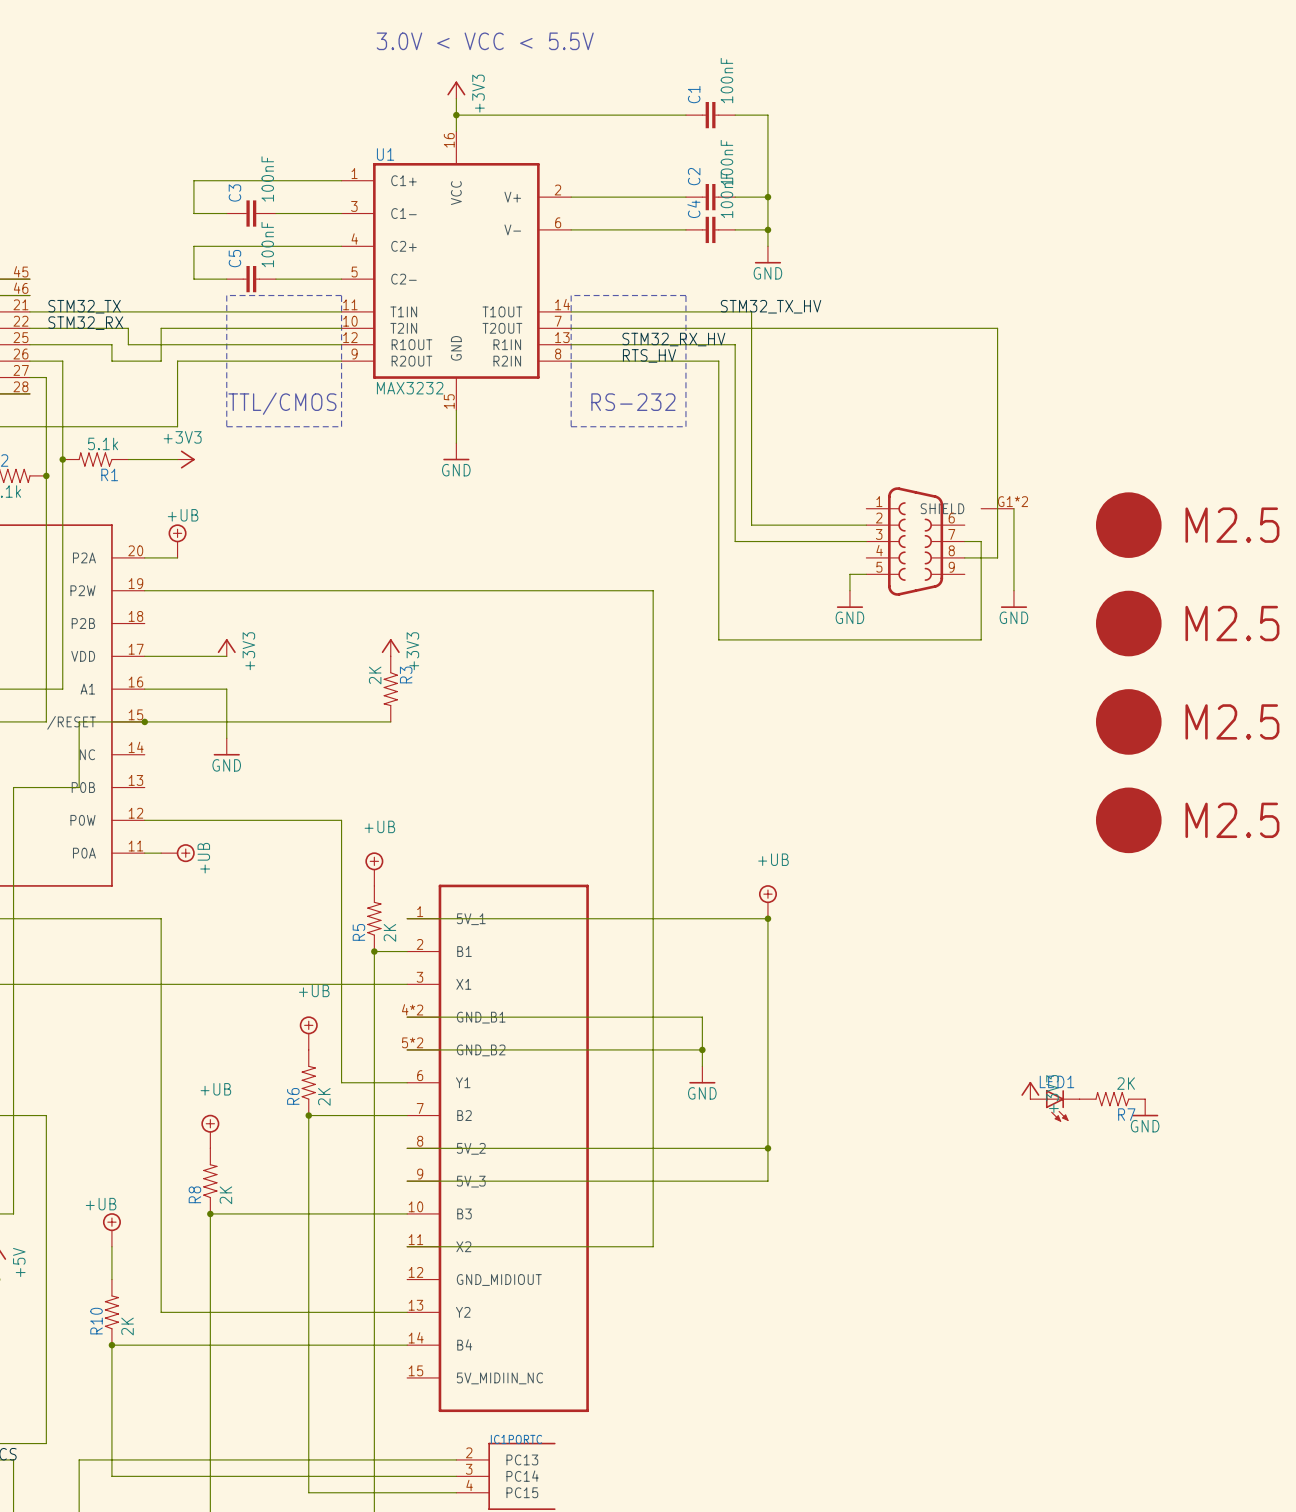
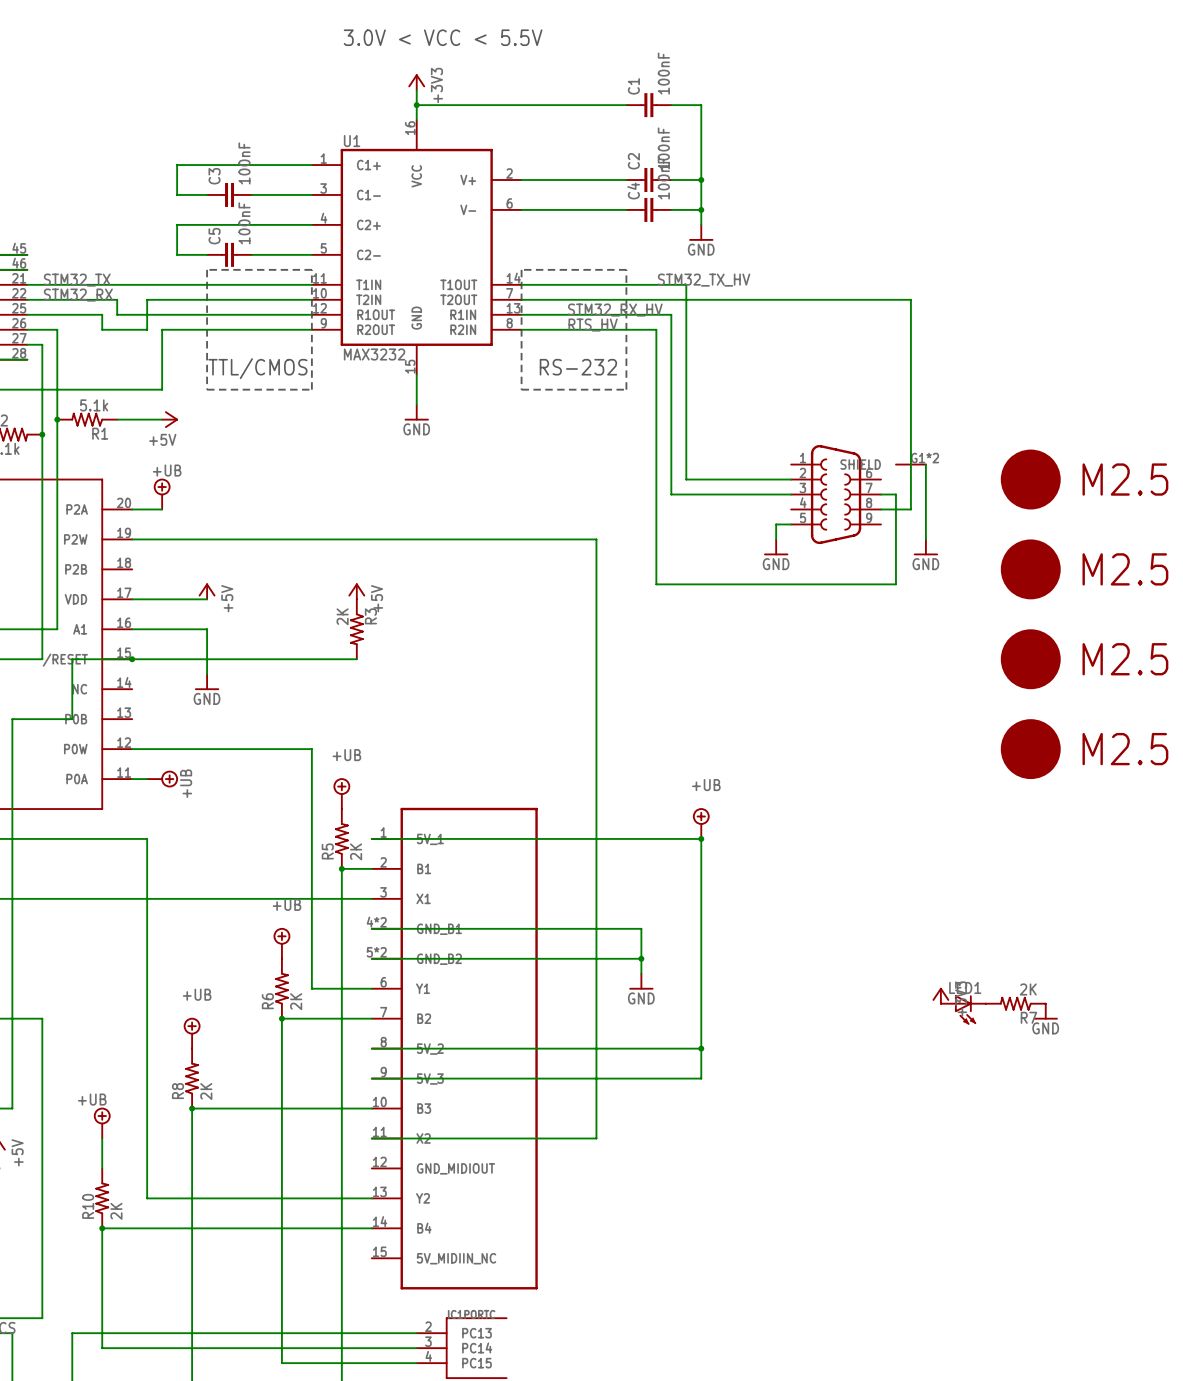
power symbol: +3V3 (186, 459) -> +5V (169, 419)
power symbol: +3V3 (226, 647) -> +5V (207, 591)
power symbol: +3V3 (390, 647) -> +5V (356, 591)

